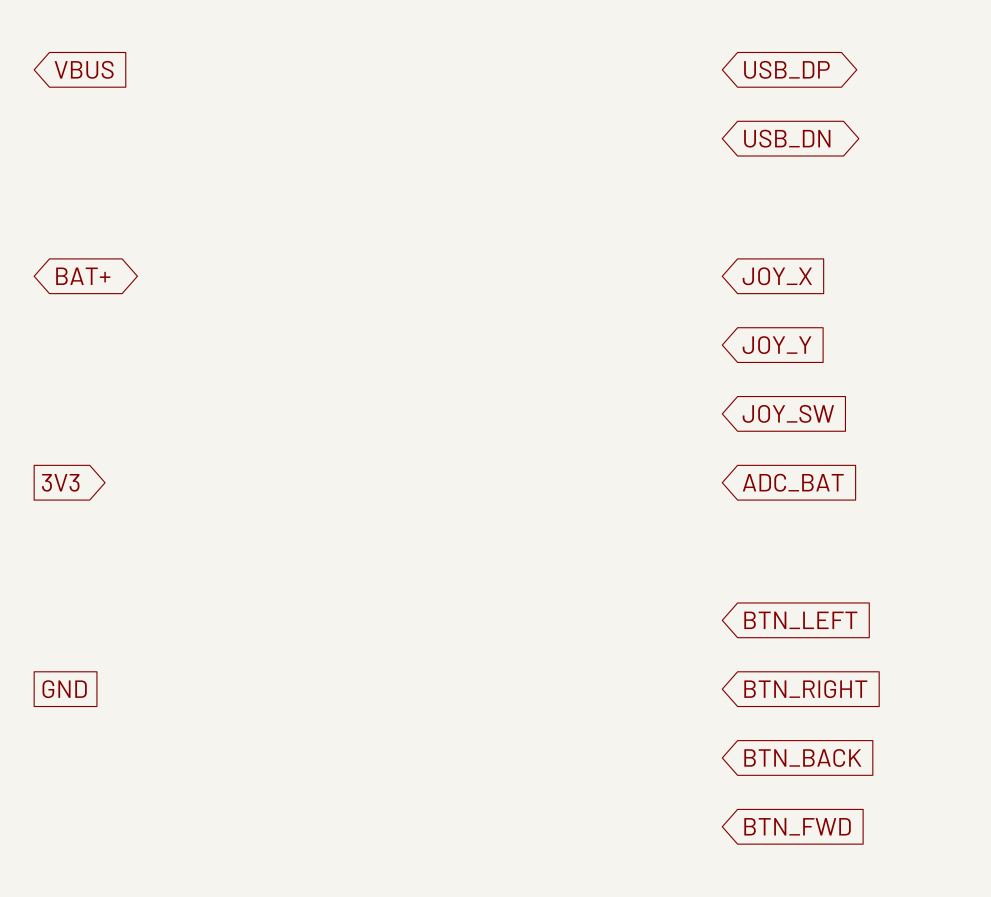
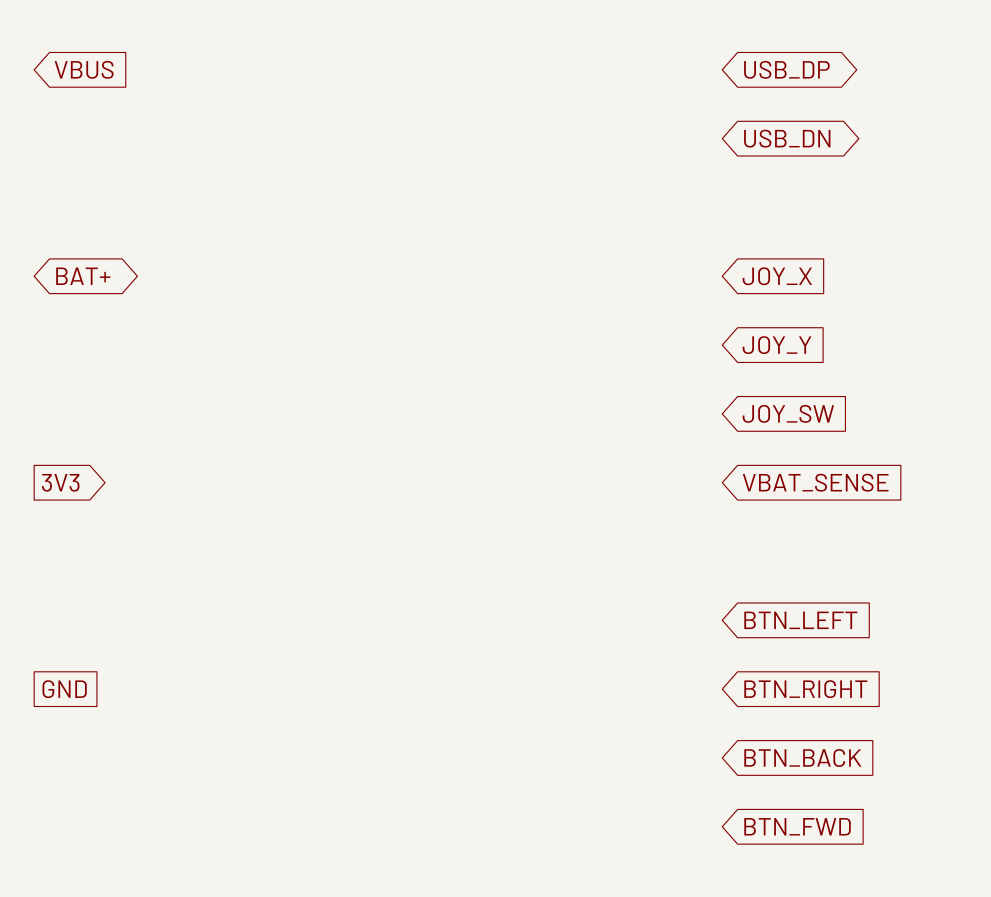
global label: ADC_BAT (793, 482) -> VBAT_SENSE (815, 482)

